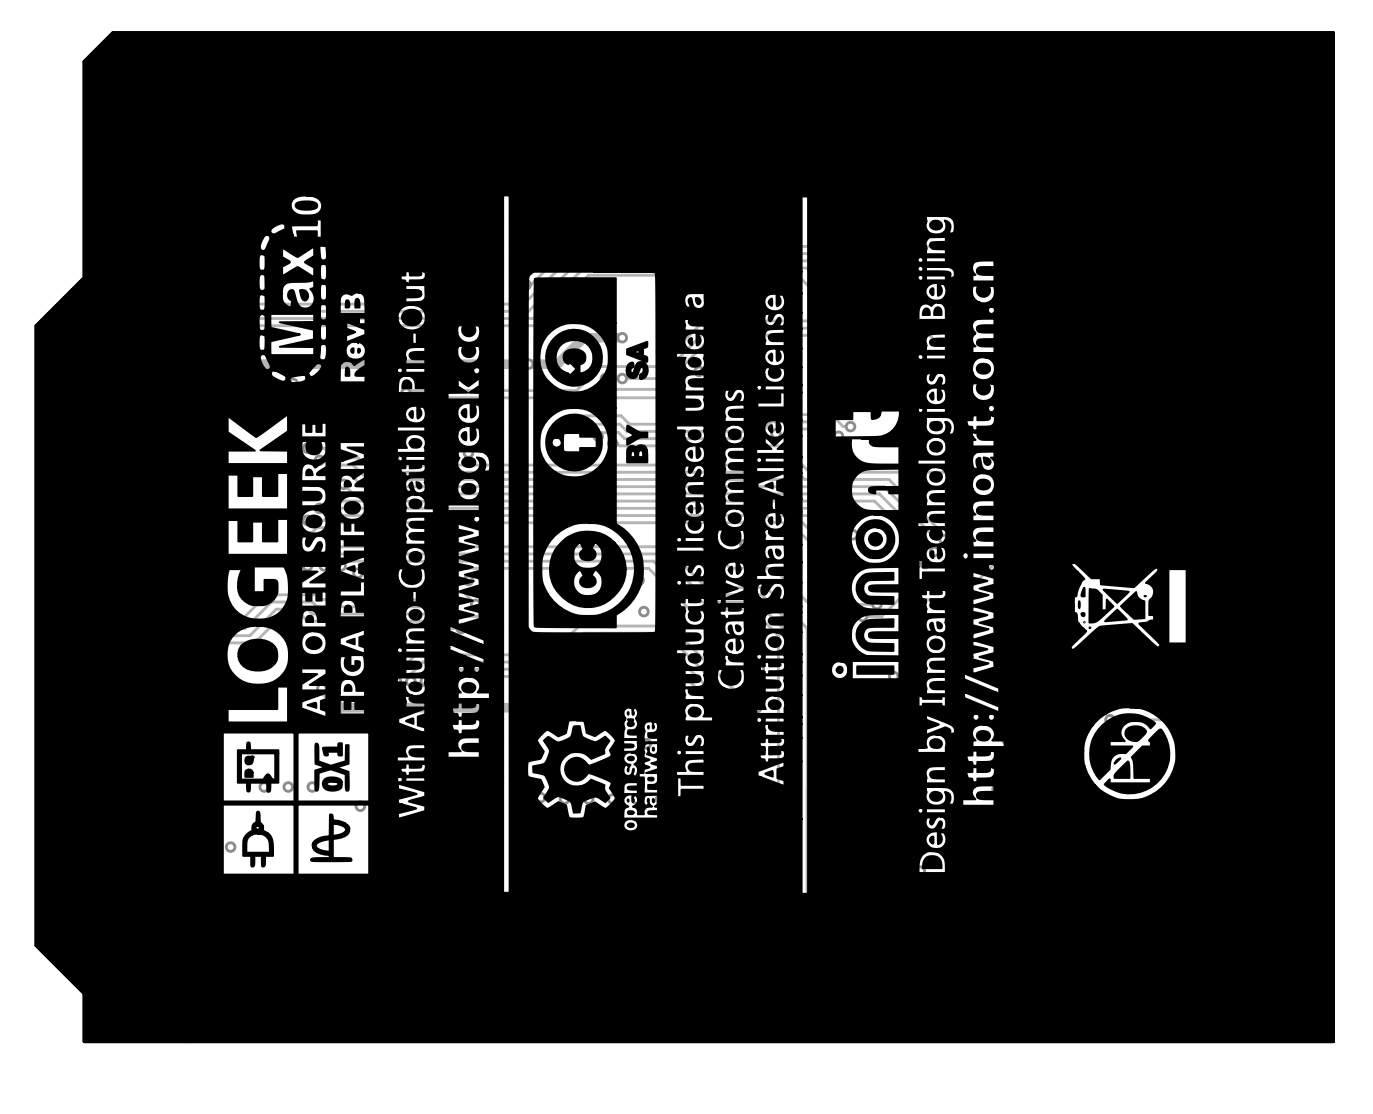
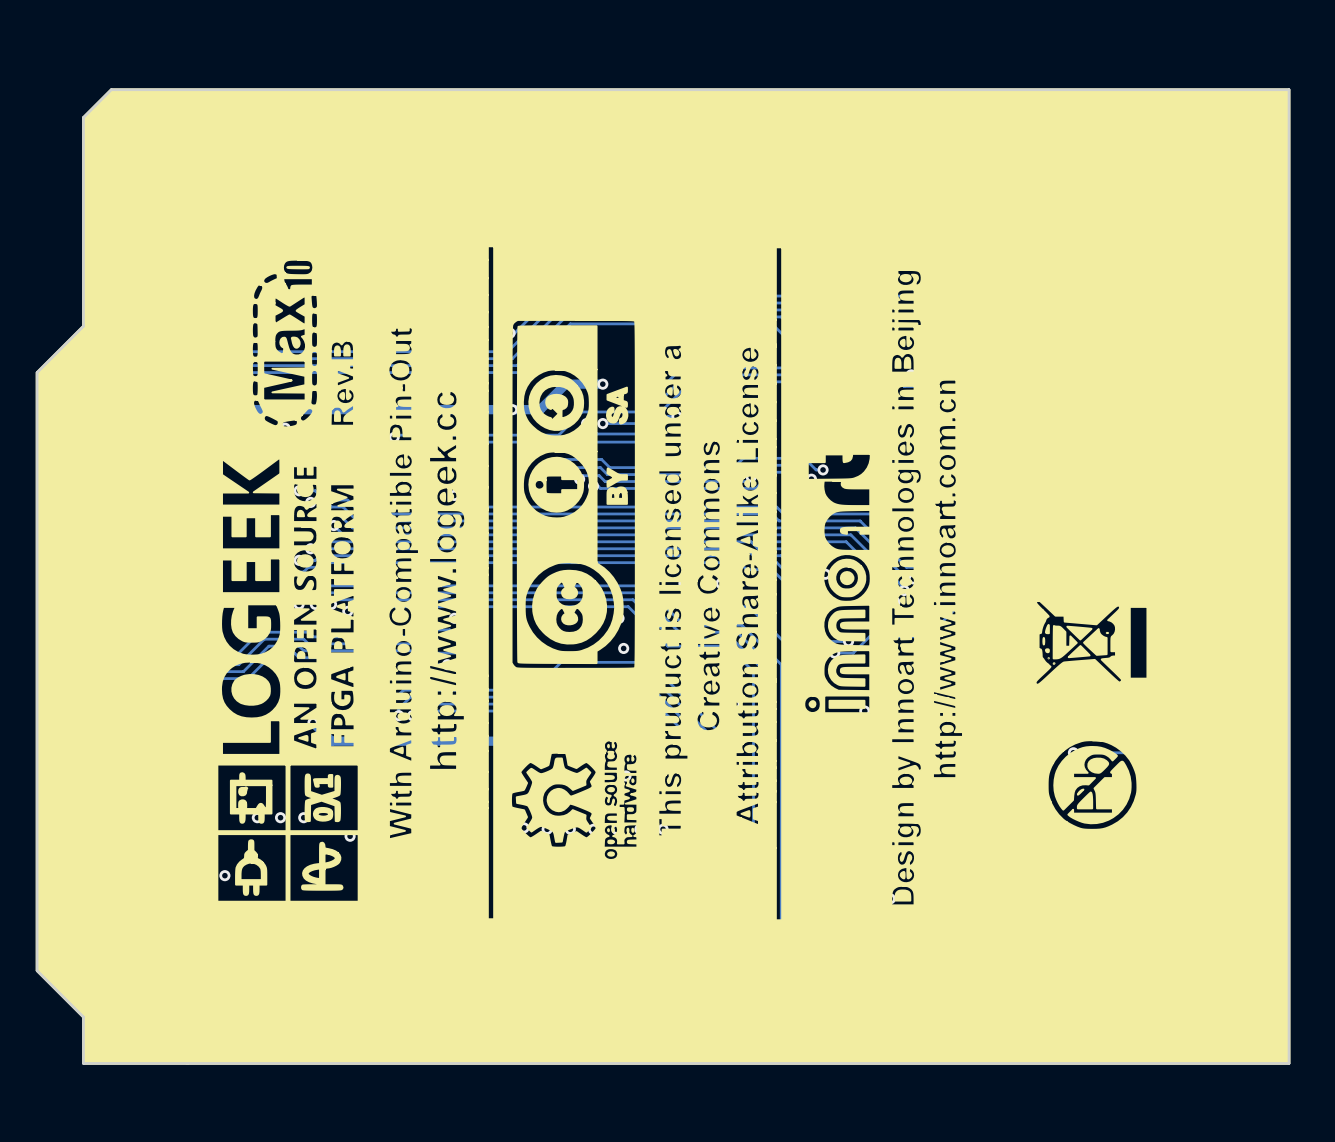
drawing shape: [141, 128, 1229, 946] -> [140, 184, 1188, 969]

